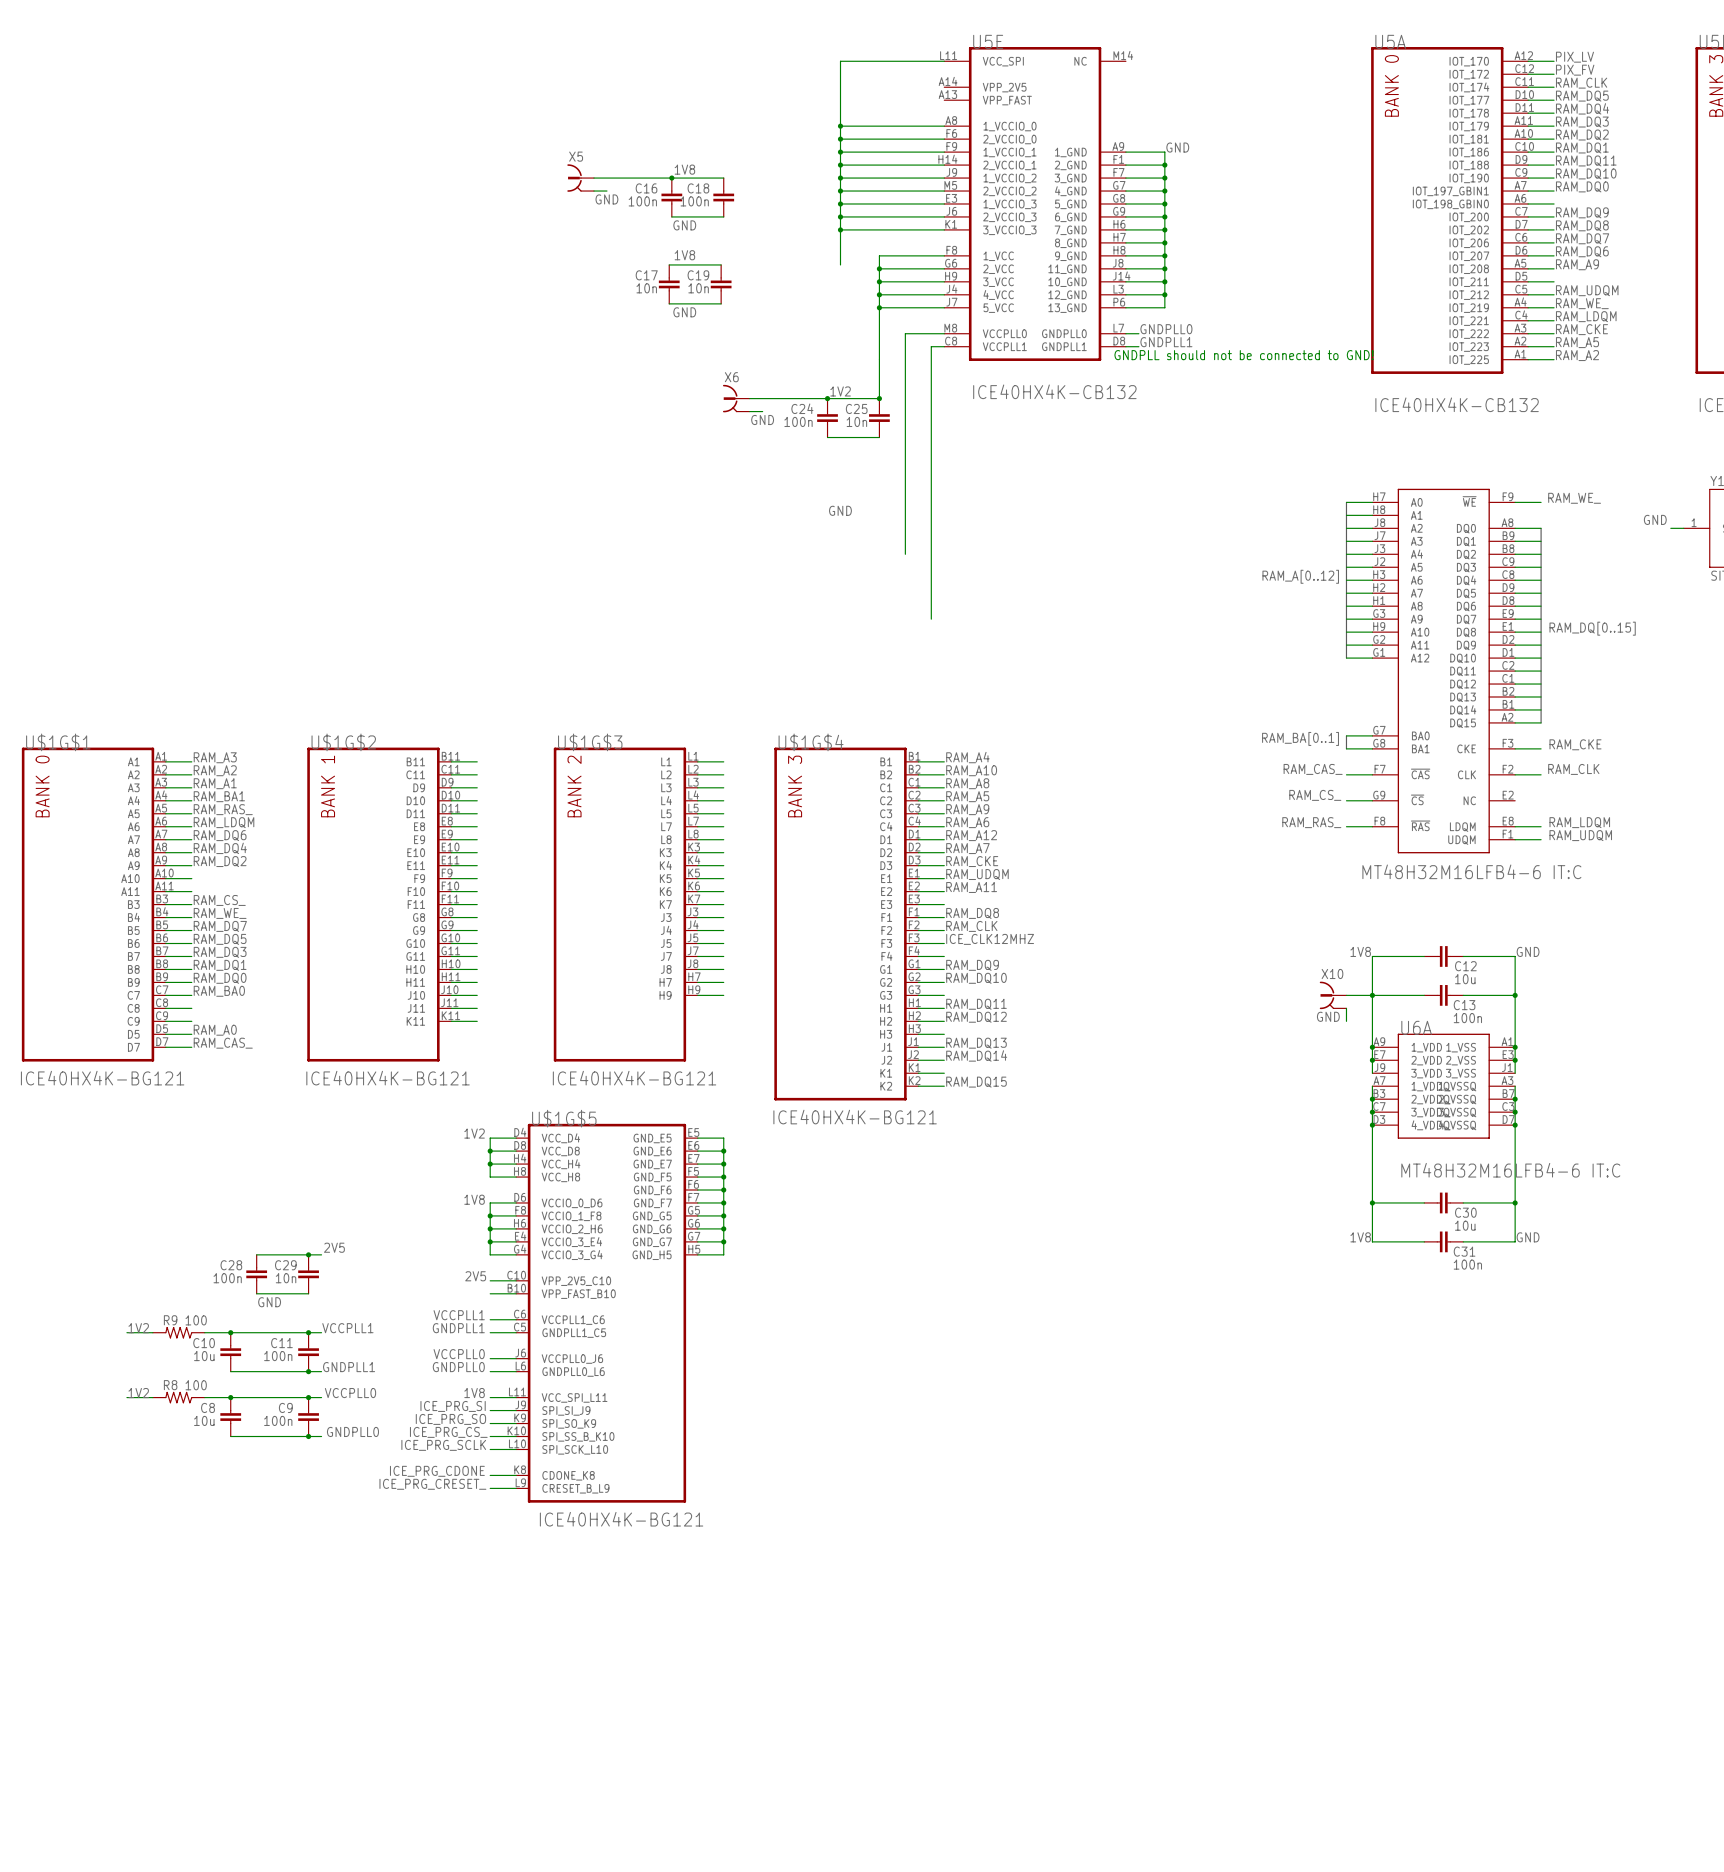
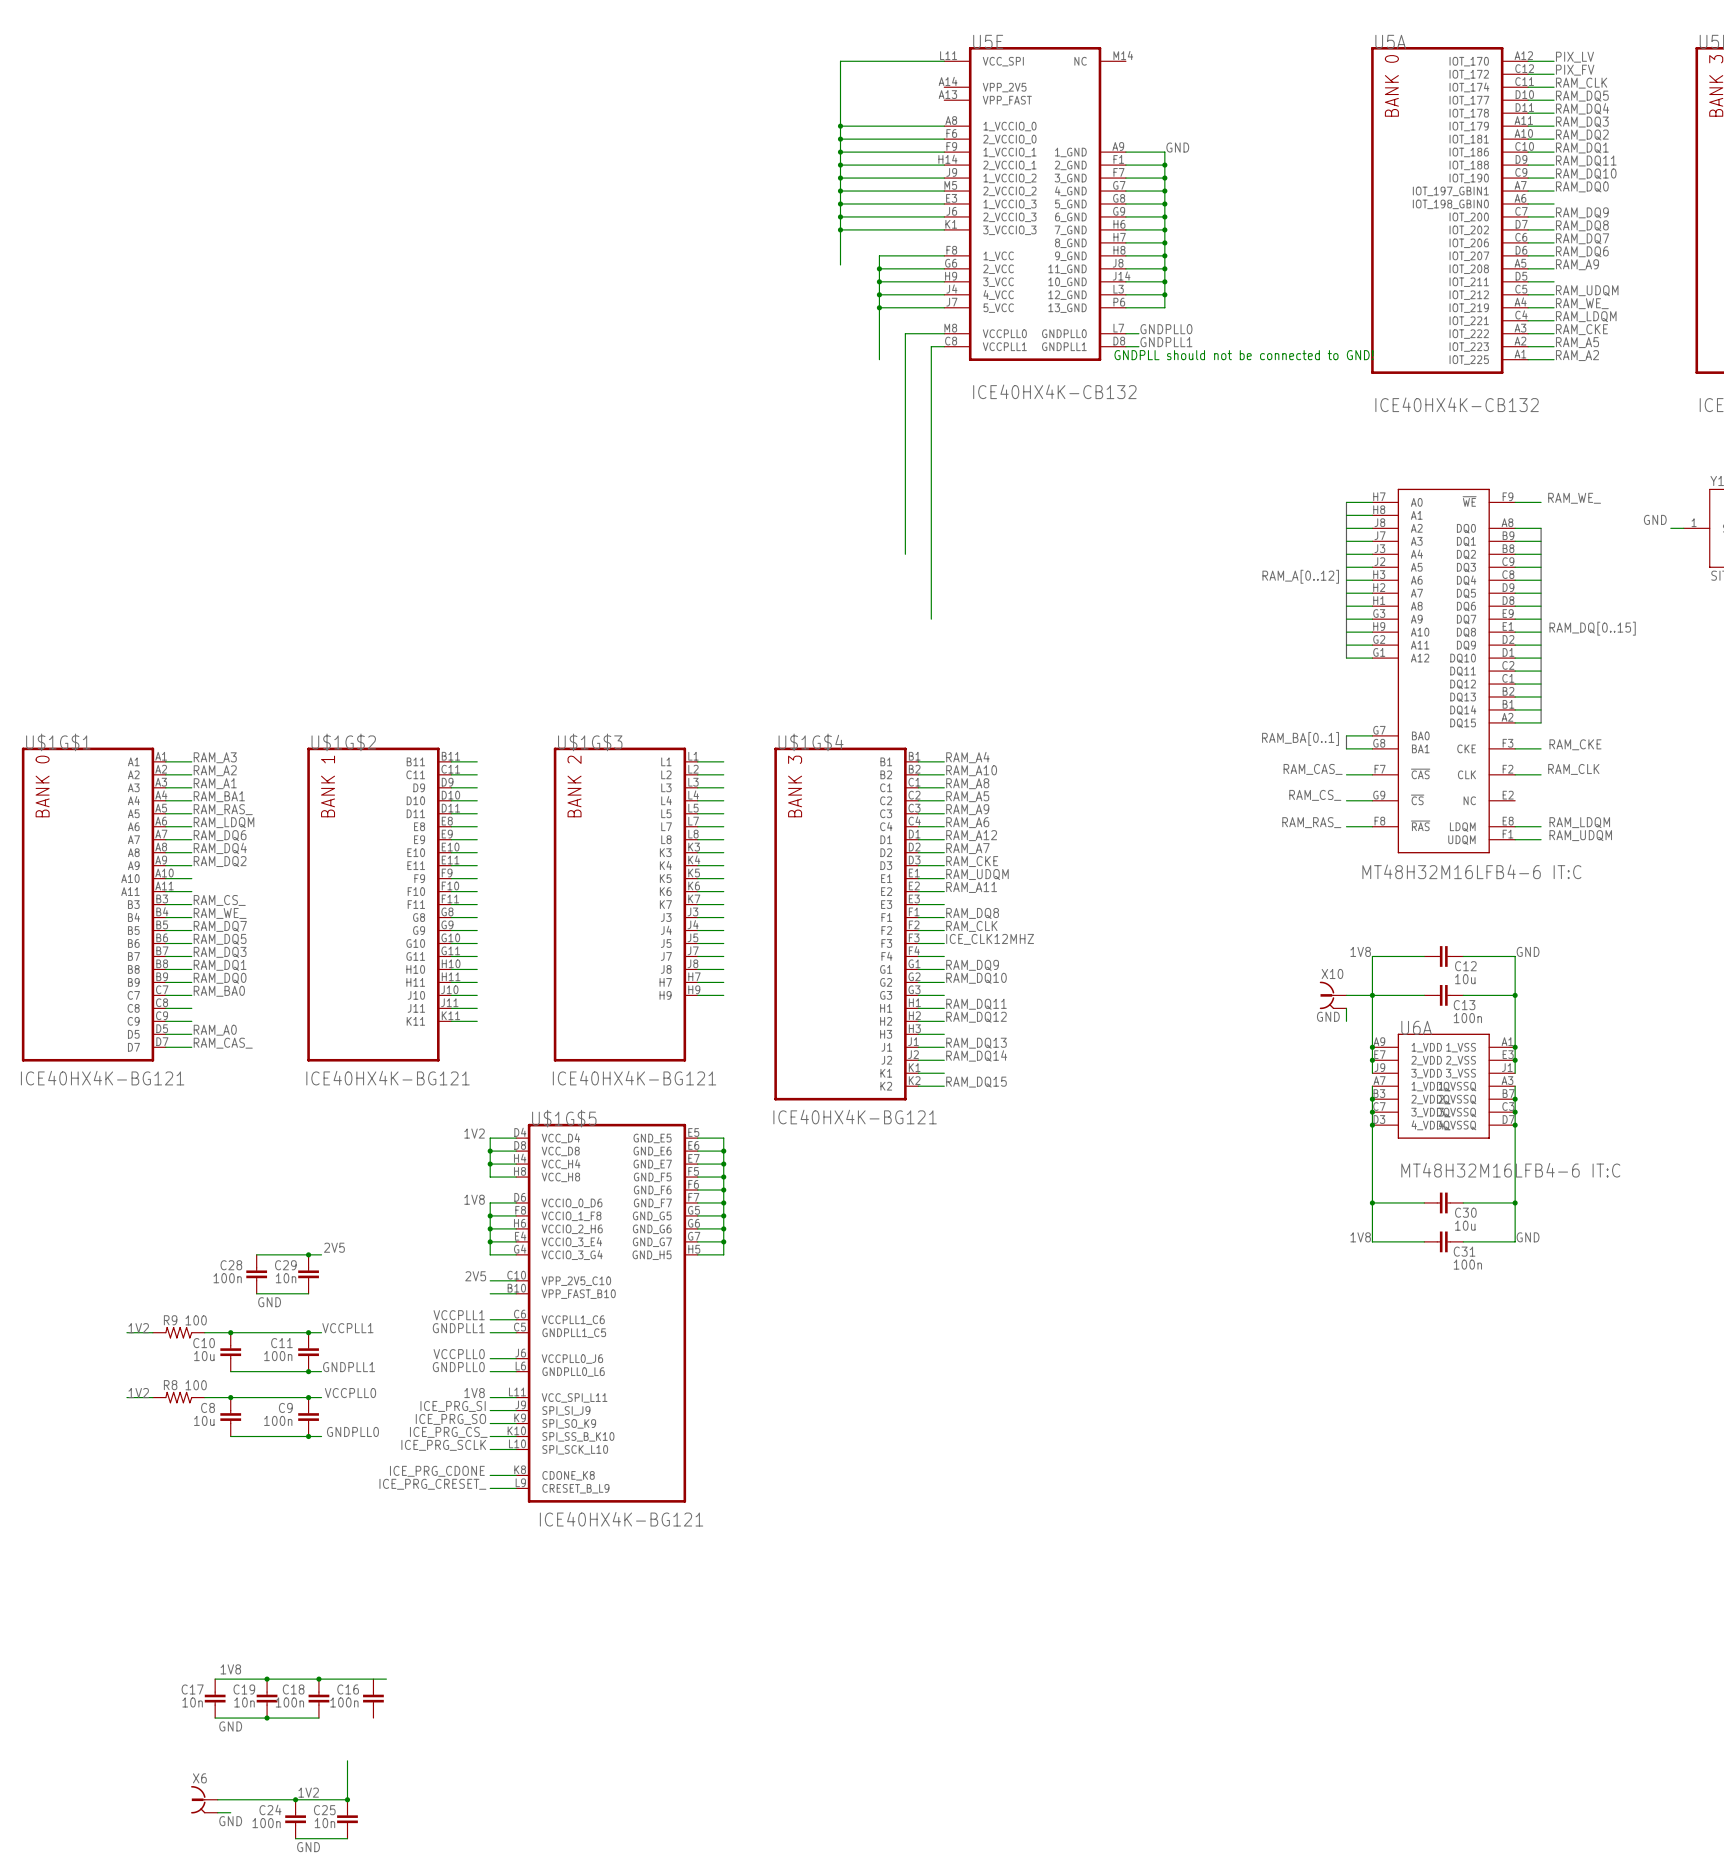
label: 1V8 (684, 169) -> none
X5: (580, 178) -> none
wire: (593, 178) (723, 178) -> none
junction: (671, 178) -> none
wire: (593, 191) (606, 191) -> none
C16 position: (671, 197) -> (373, 1698)
C18 position: (723, 197) -> (318, 1698)
label: GND (606, 199) -> none
wire: (671, 216) (723, 216) -> none
label: GND (684, 225) -> none
label: 1V8 (684, 255) -> none
wire: (669, 264) (721, 264) -> none
C17 position: (669, 284) -> (215, 1698)
C19 position: (721, 284) -> (267, 1698)
wire: (669, 303) (721, 303) -> none
label: GND (684, 312) -> none
wire: (879, 359) (879, 398) (749, 398) -> none
label: 1V2 (840, 391) -> none
X6 position: (736, 398) -> (204, 1799)
junction: (827, 398) -> none
junction: (879, 398) -> none
wire: (749, 411) (762, 411) -> none
C24 position: (827, 418) -> (295, 1819)
C25 position: (879, 418) -> (347, 1819)
label: GND (762, 420) -> none
wire: (827, 437) (879, 437) -> none
label: GND (840, 510) -> none
label: none -> 1V8 (230, 1669)
wire: none -> (215, 1679) (386, 1679)
junction: none -> (267, 1679)
junction: none -> (318, 1679)
wire: none -> (215, 1718) (318, 1718)
junction: none -> (267, 1718)
label: none -> GND (230, 1726)
wire: none -> (347, 1760) (347, 1799) (217, 1799)
label: none -> 1V2 (308, 1792)
junction: none -> (295, 1799)
junction: none -> (347, 1799)
wire: none -> (217, 1812) (230, 1812)
label: none -> GND (230, 1821)
wire: none -> (295, 1838) (347, 1838)
label: none -> GND (308, 1847)

